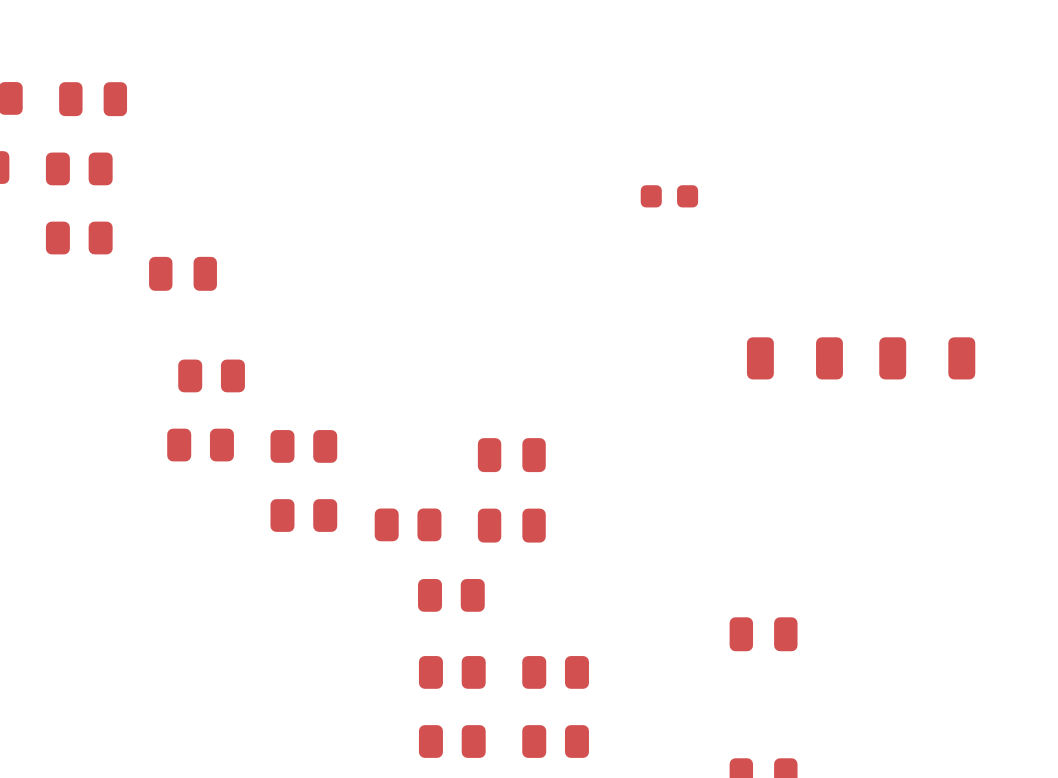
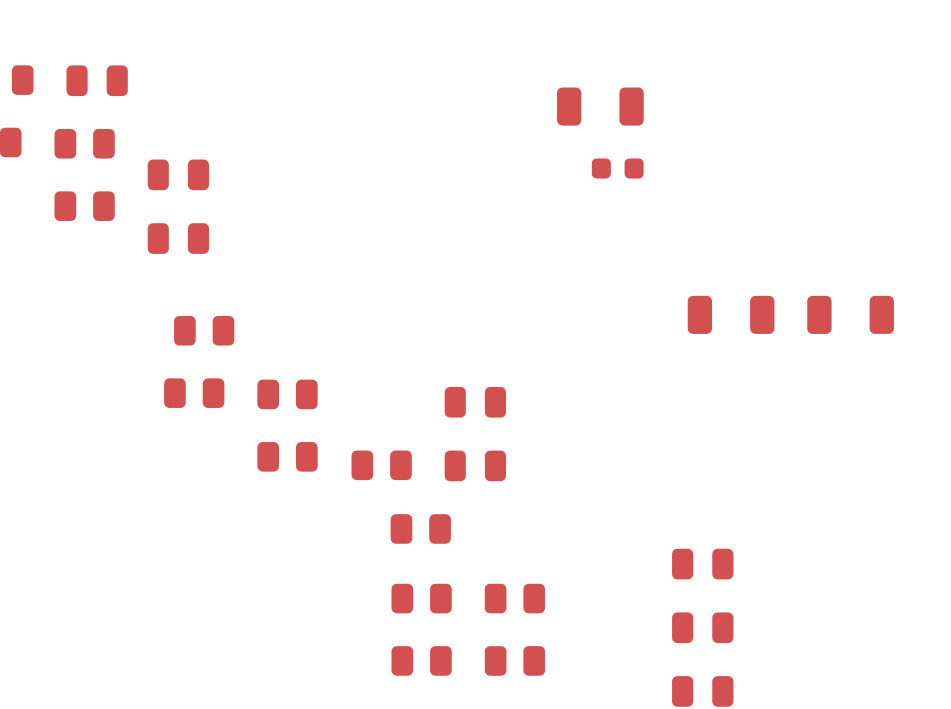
part: none -> (600, 106)
part: none -> (178, 174)
part: none -> (702, 627)

